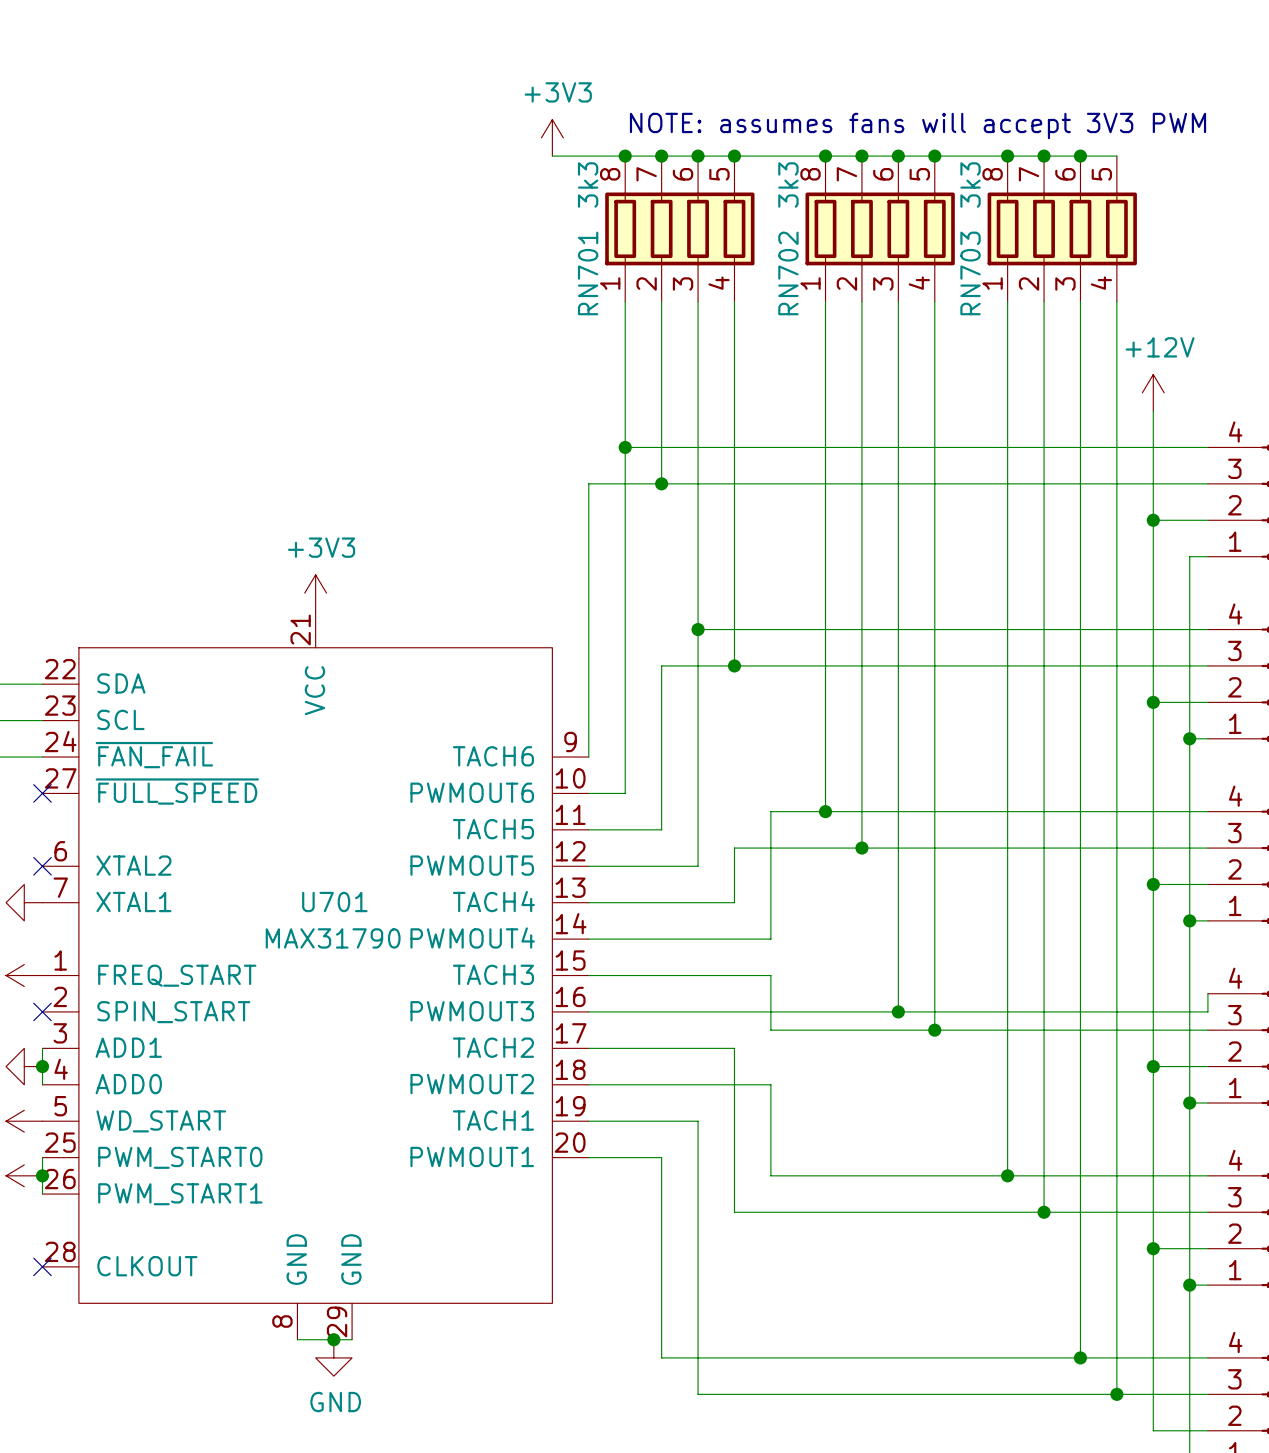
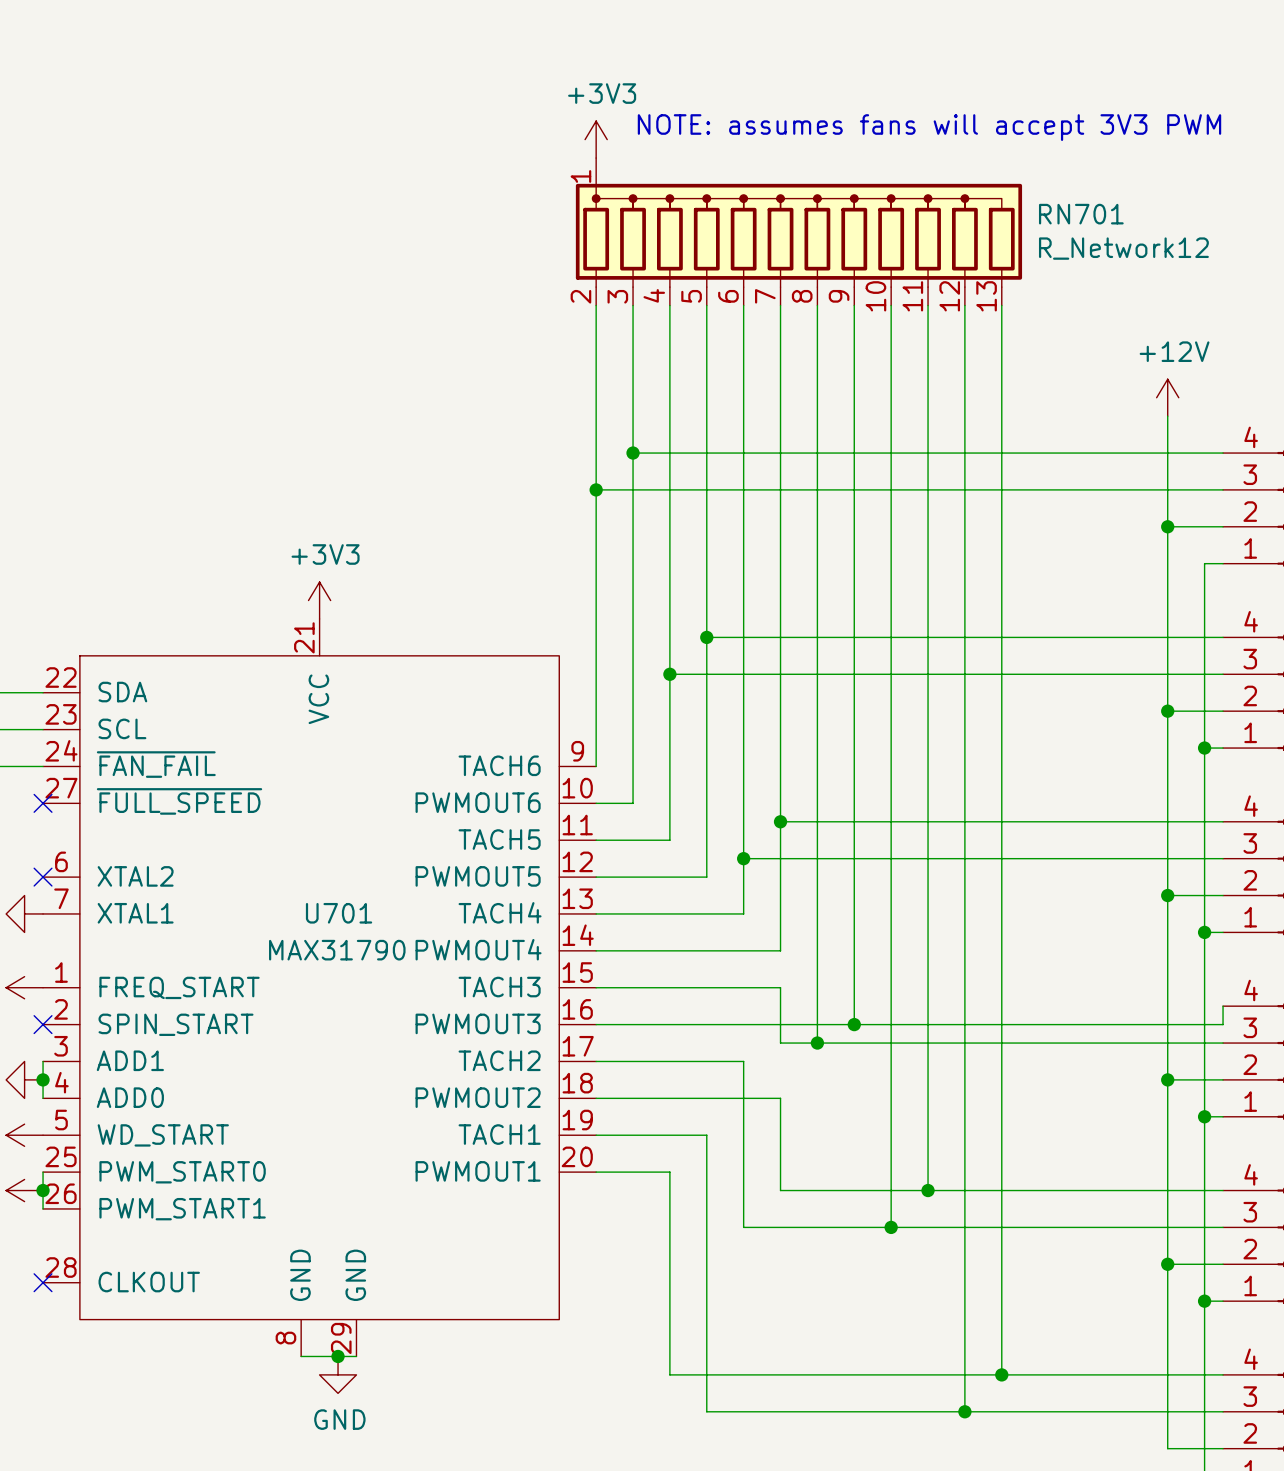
power symbol position: +3V3 (552, 137) -> +3V3 (596, 139)
wire: (552, 156) (1116, 156) -> none
RN701 symbol: [605, 156, 755, 302] -> [575, 158, 1023, 306]
junction: (625, 156) -> none
junction: (661, 156) -> none
junction: (698, 156) -> none
junction: (734, 156) -> none
junction: (825, 156) -> none
junction: (861, 156) -> none
junction: (898, 156) -> none
junction: (934, 156) -> none
junction: (1007, 156) -> none
junction: (1044, 156) -> none
junction: (1080, 156) -> none
RN701 value: 3k3 (588, 185) -> R_Network12 (1123, 248)
RN702: 3k3 (880, 228) -> none
RN703: 3k3 (1062, 228) -> none
RN701 name position: RN701 (588, 273) -> RN701 (1081, 214)
wire: none -> (596, 305) (596, 489)
wire: (825, 301) (825, 811) -> (780, 305) (780, 821)
wire: (861, 301) (861, 848) -> none
wire: (898, 301) (898, 1011) -> (854, 305) (854, 1024)
wire: (934, 301) (934, 1030) -> (817, 305) (817, 1043)
wire: (1007, 301) (1007, 1175) -> (928, 305) (928, 1190)
wire: (1044, 301) (1044, 1212) -> (891, 305) (891, 1227)
wire: (1080, 301) (1080, 1357) -> (1001, 305) (1001, 1374)
wire: (1116, 301) (1116, 1394) -> (964, 305) (964, 1411)
wire: none -> (669, 489) (669, 674)
junction position: (661, 483) -> (596, 489)
wire: none -> (743, 674) (743, 858)
junction position: (734, 665) -> (669, 674)
junction: none -> (780, 821)
junction: (825, 811) -> none
junction: none -> (743, 858)
junction: (861, 848) -> none
junction: none -> (854, 1024)
junction: (898, 1011) -> none
junction: none -> (817, 1043)
junction: (934, 1030) -> none
junction: none -> (928, 1190)
junction: (1007, 1175) -> none
junction: none -> (891, 1227)
junction: (1044, 1212) -> none
junction: none -> (1001, 1374)
junction: (1080, 1357) -> none
junction: none -> (964, 1411)
junction: (1116, 1394) -> none

